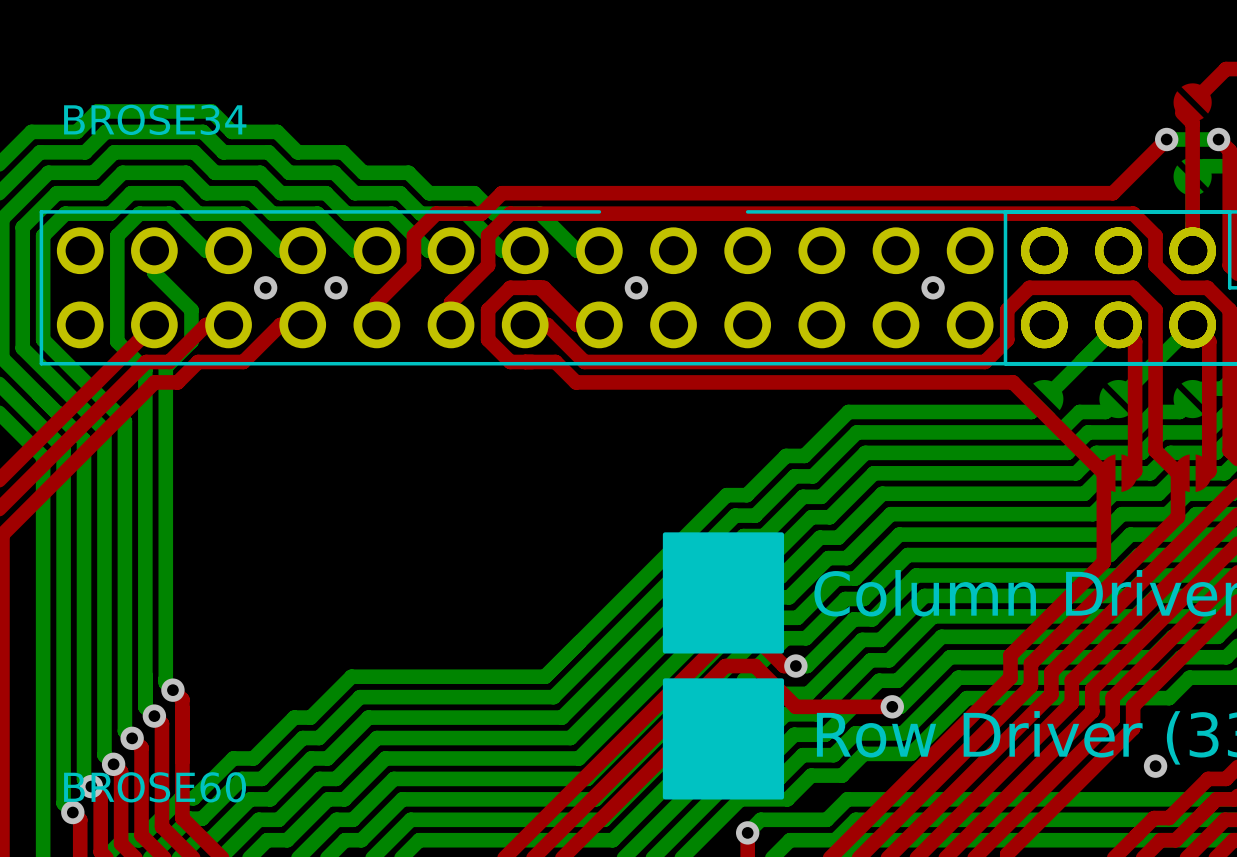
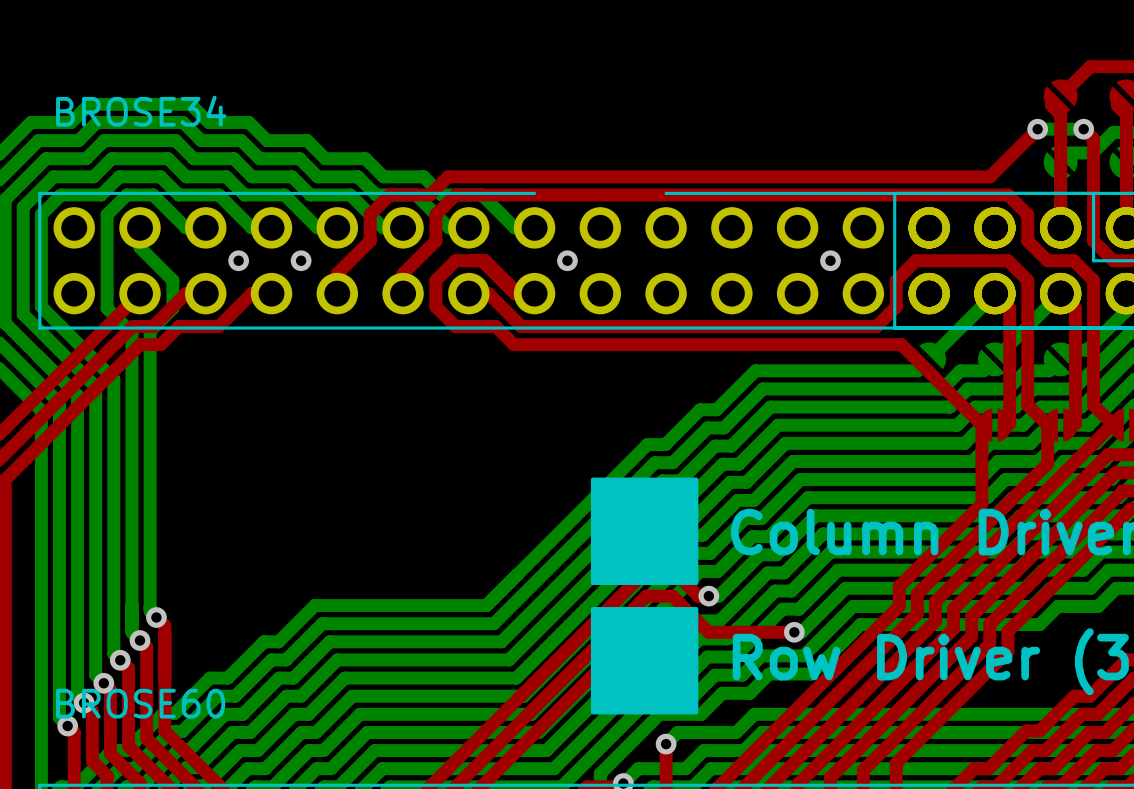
via: (1155, 766) -> none

